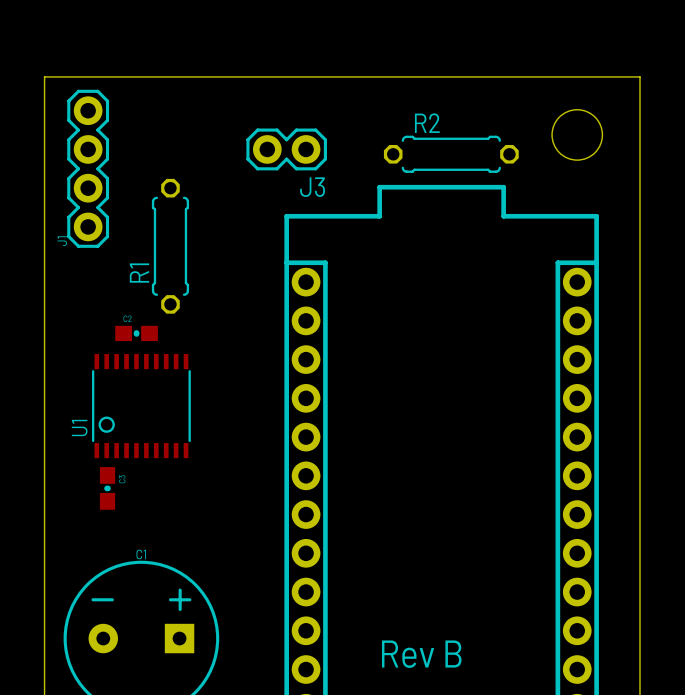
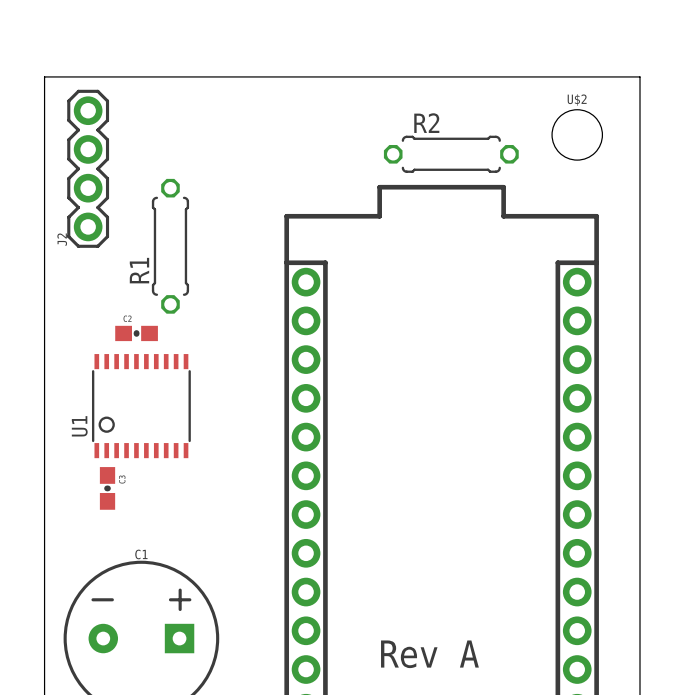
U$2 name: none -> U$2 (577, 100)
J3: (286, 149) -> none
J1 name: J1 (62, 241) -> J2 (62, 239)
text: Rev B (421, 654) -> Rev A (429, 654)

